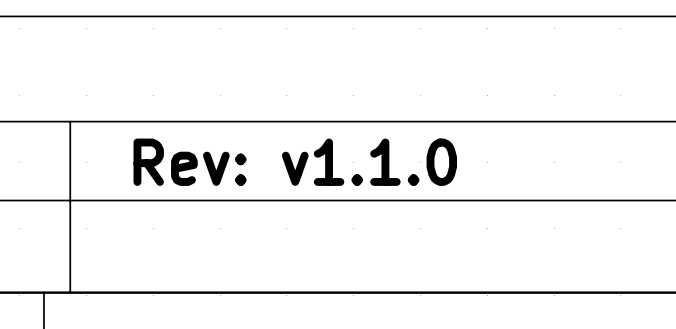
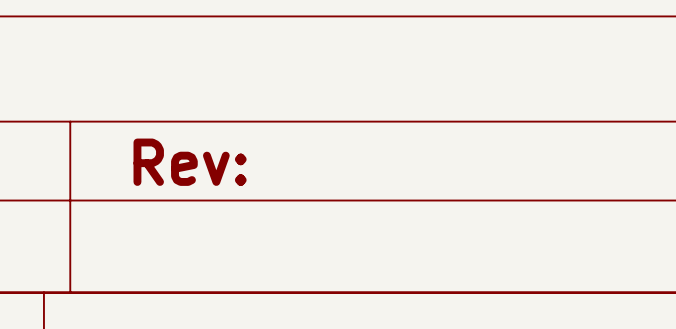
title block: Rev: v1.1.0 (295, 162) -> Rev: (190, 162)

